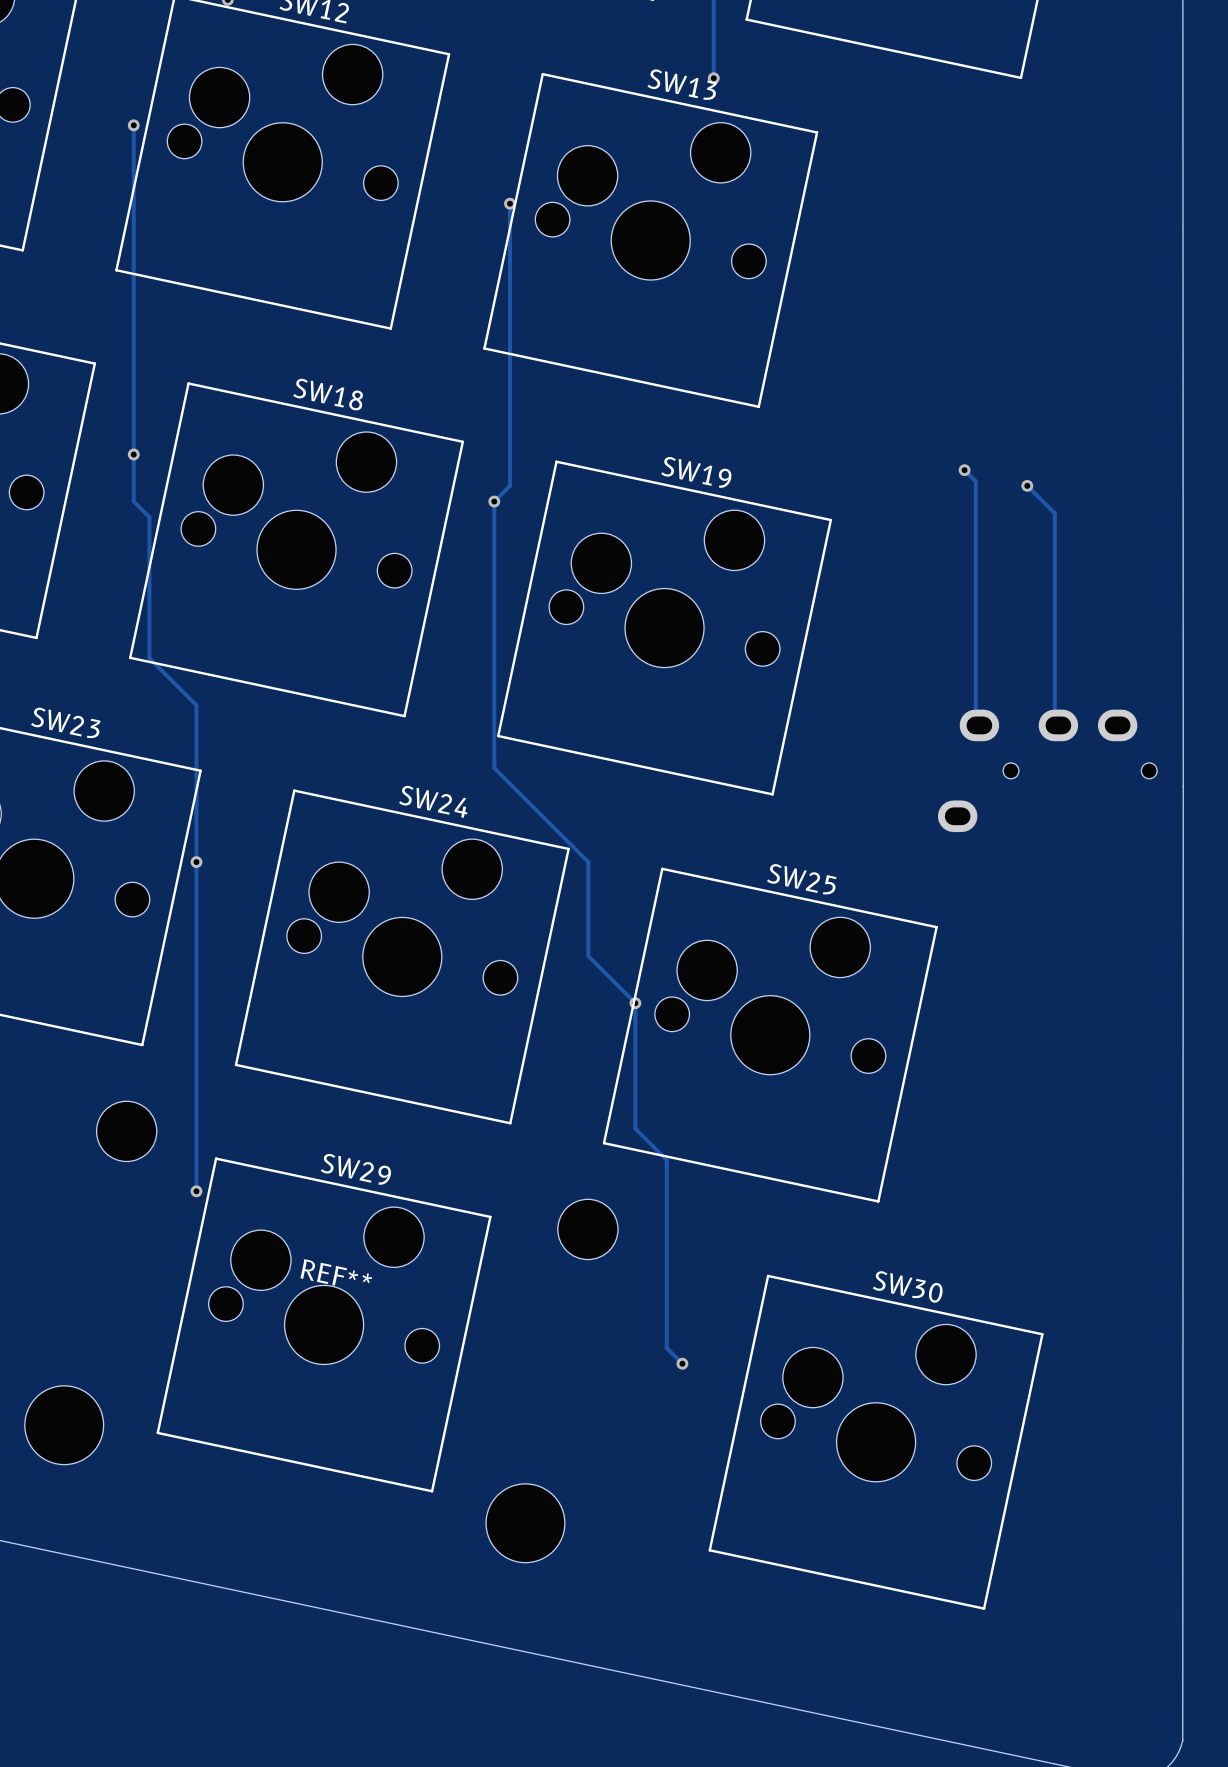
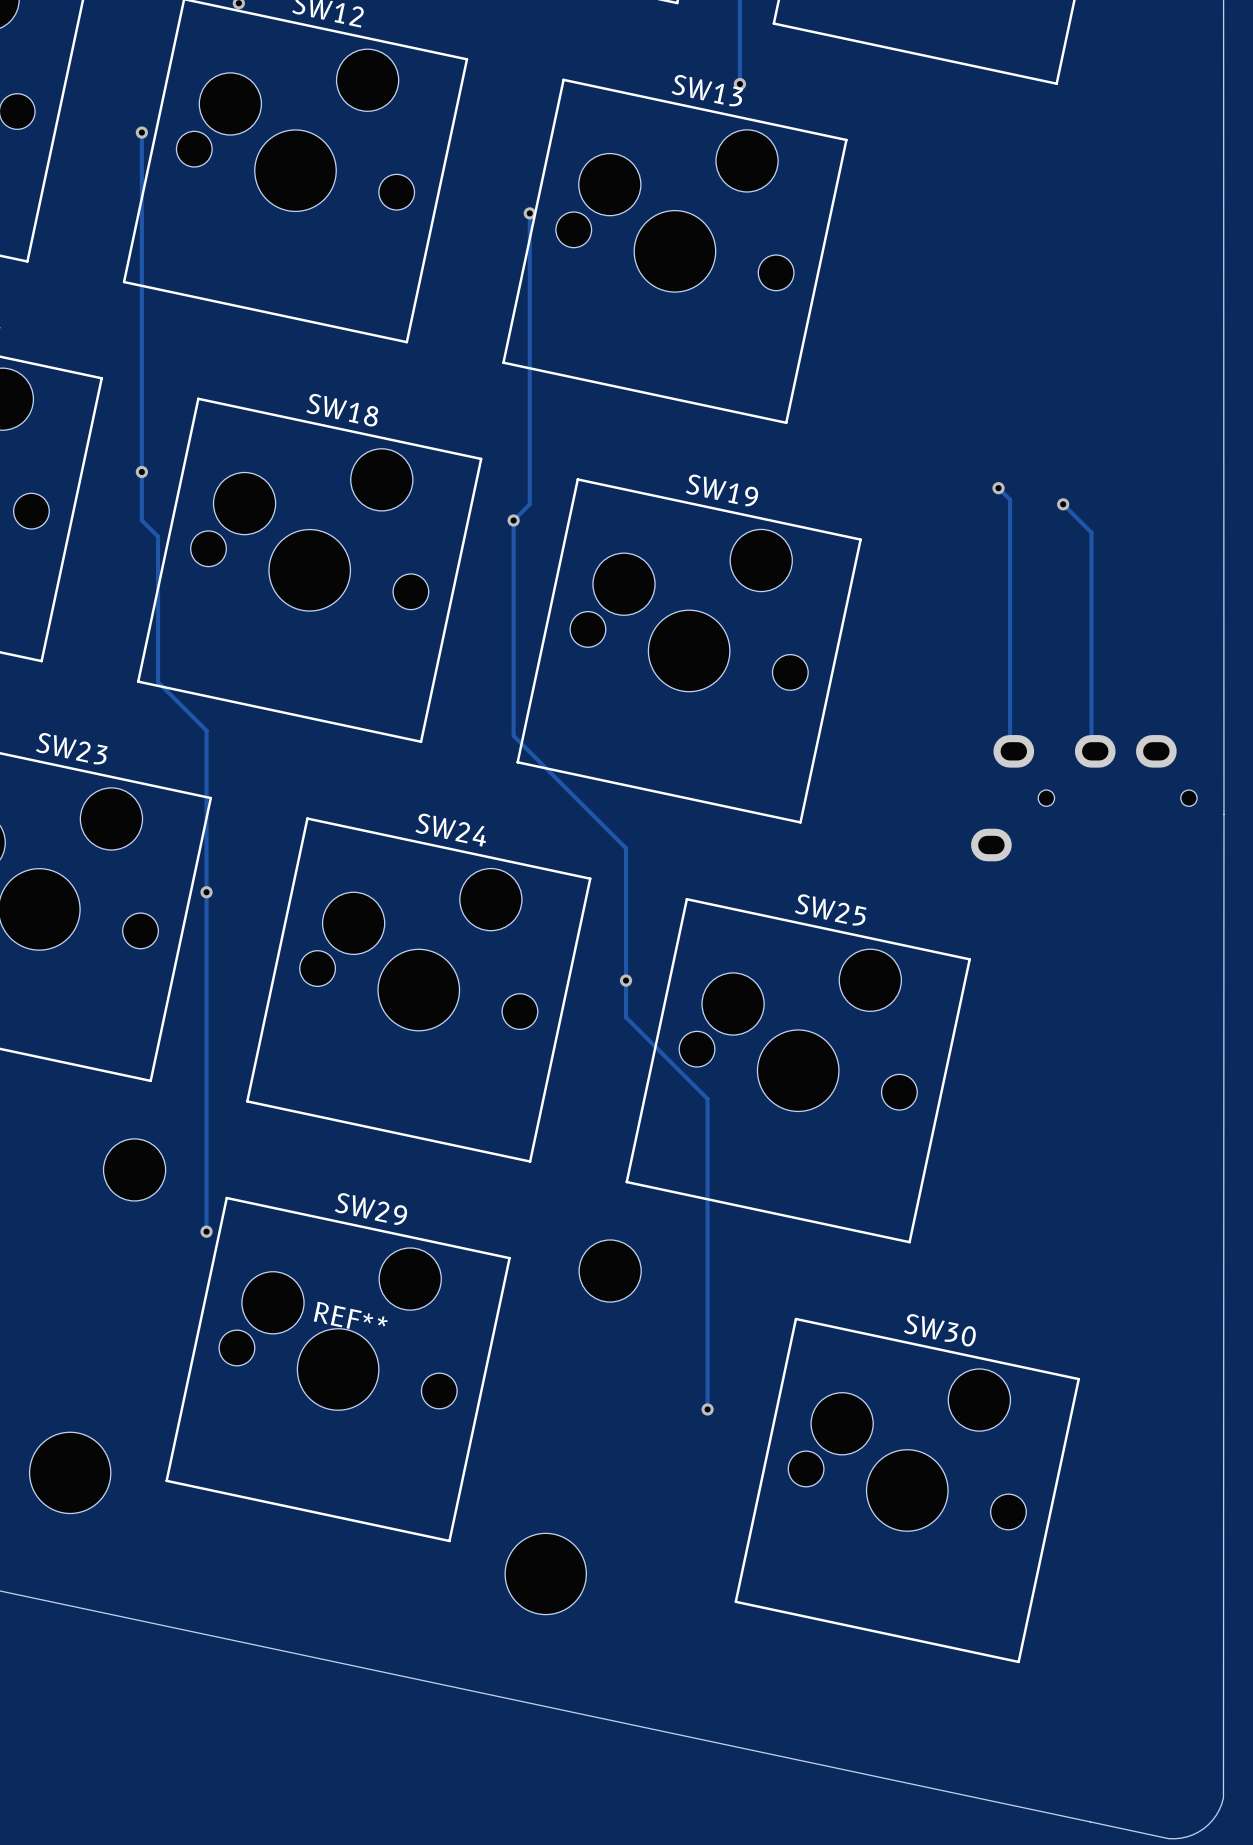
track: (494, 710) (494, 768) (588, 862) (588, 956) (635, 1003) (635, 1128) (666, 1159) (666, 1348) (682, 1363) -> (513, 735) (626, 848) (626, 1017) (707, 1098) (707, 1409)
via position: (635, 1003) -> (626, 980)

